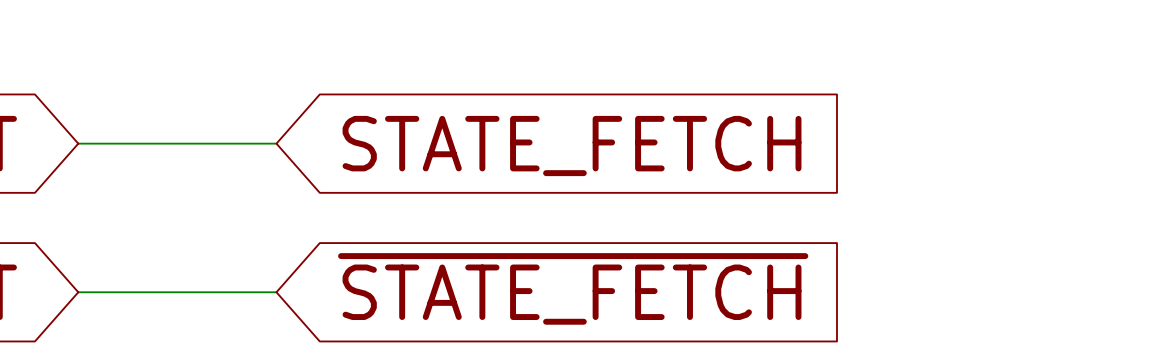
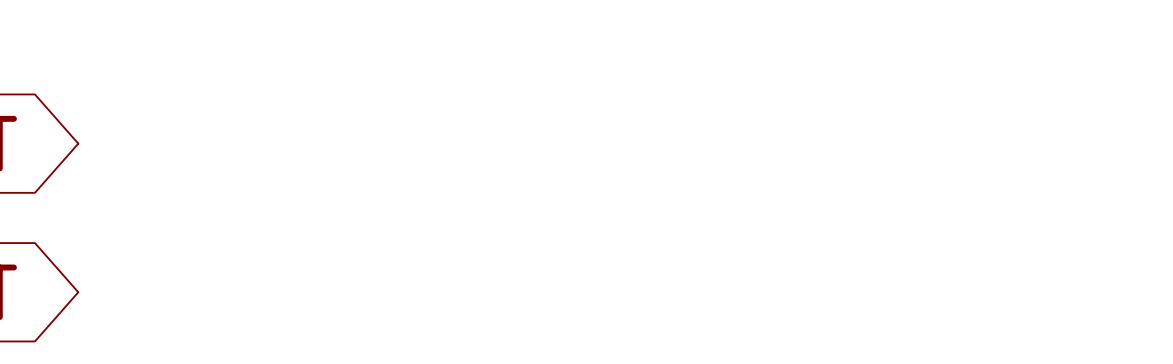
wire: (78, 143) (276, 143) -> none
global label: STATE_FETCH (572, 146) -> none
global label: ~{STATE_FETCH} (573, 288) -> none
wire: (78, 292) (276, 292) -> none

